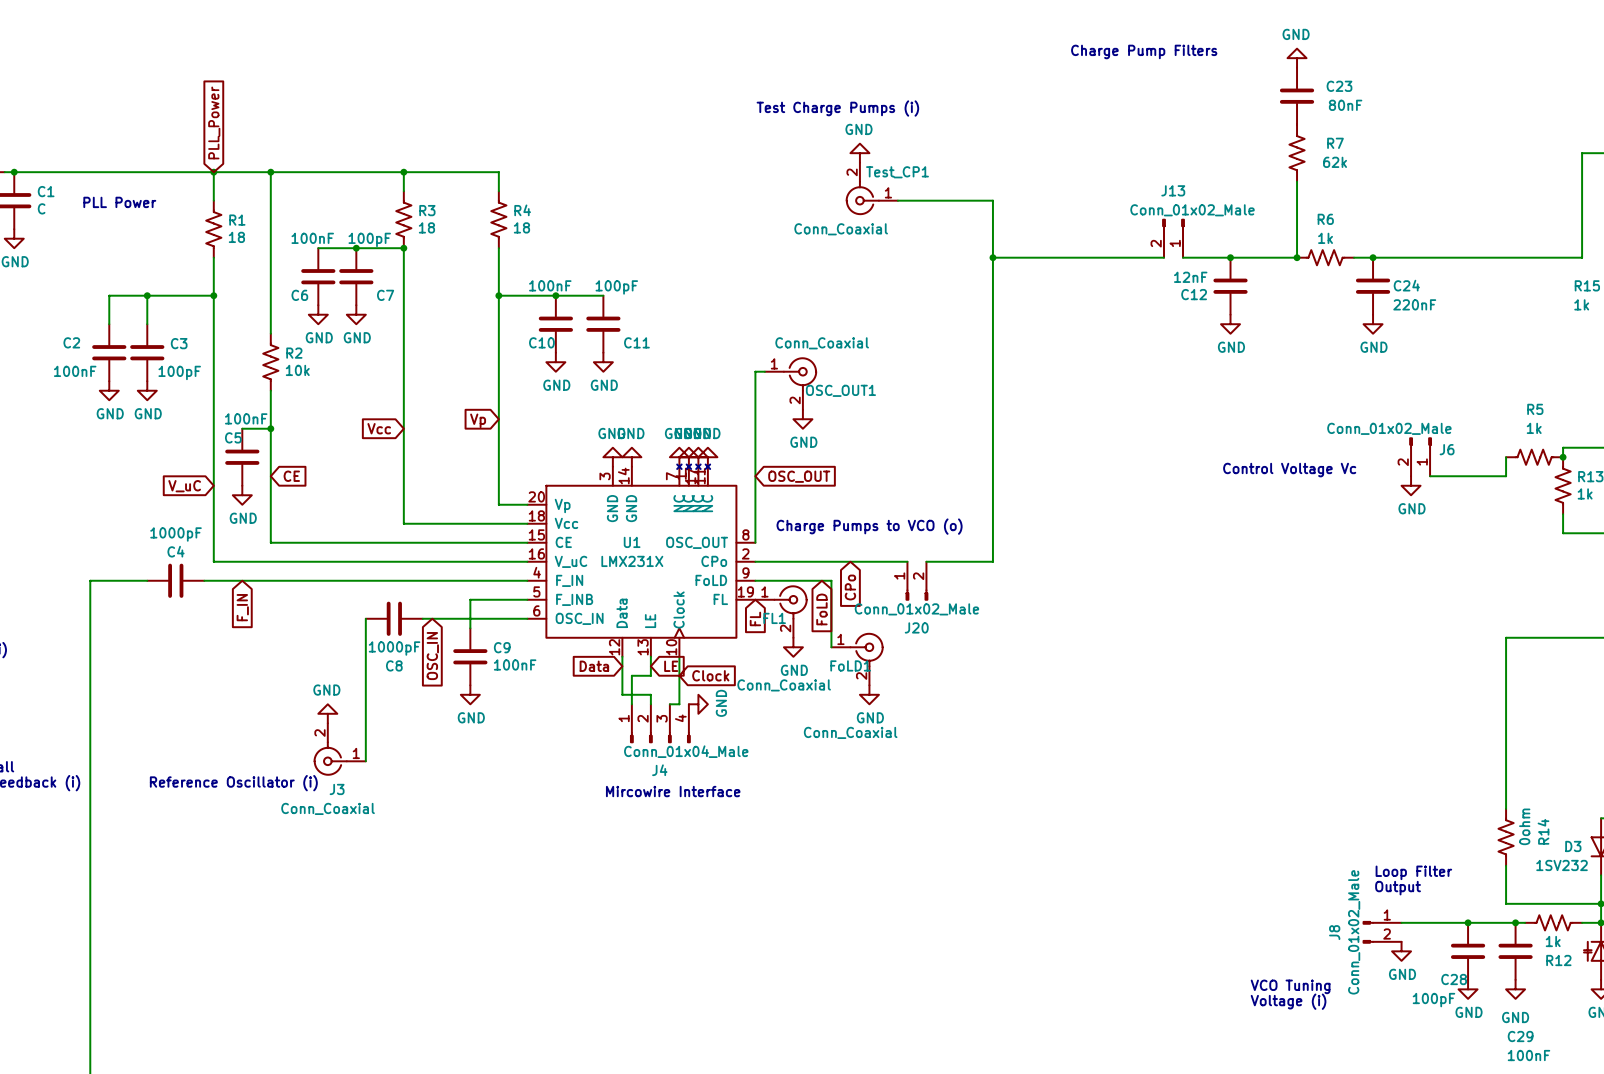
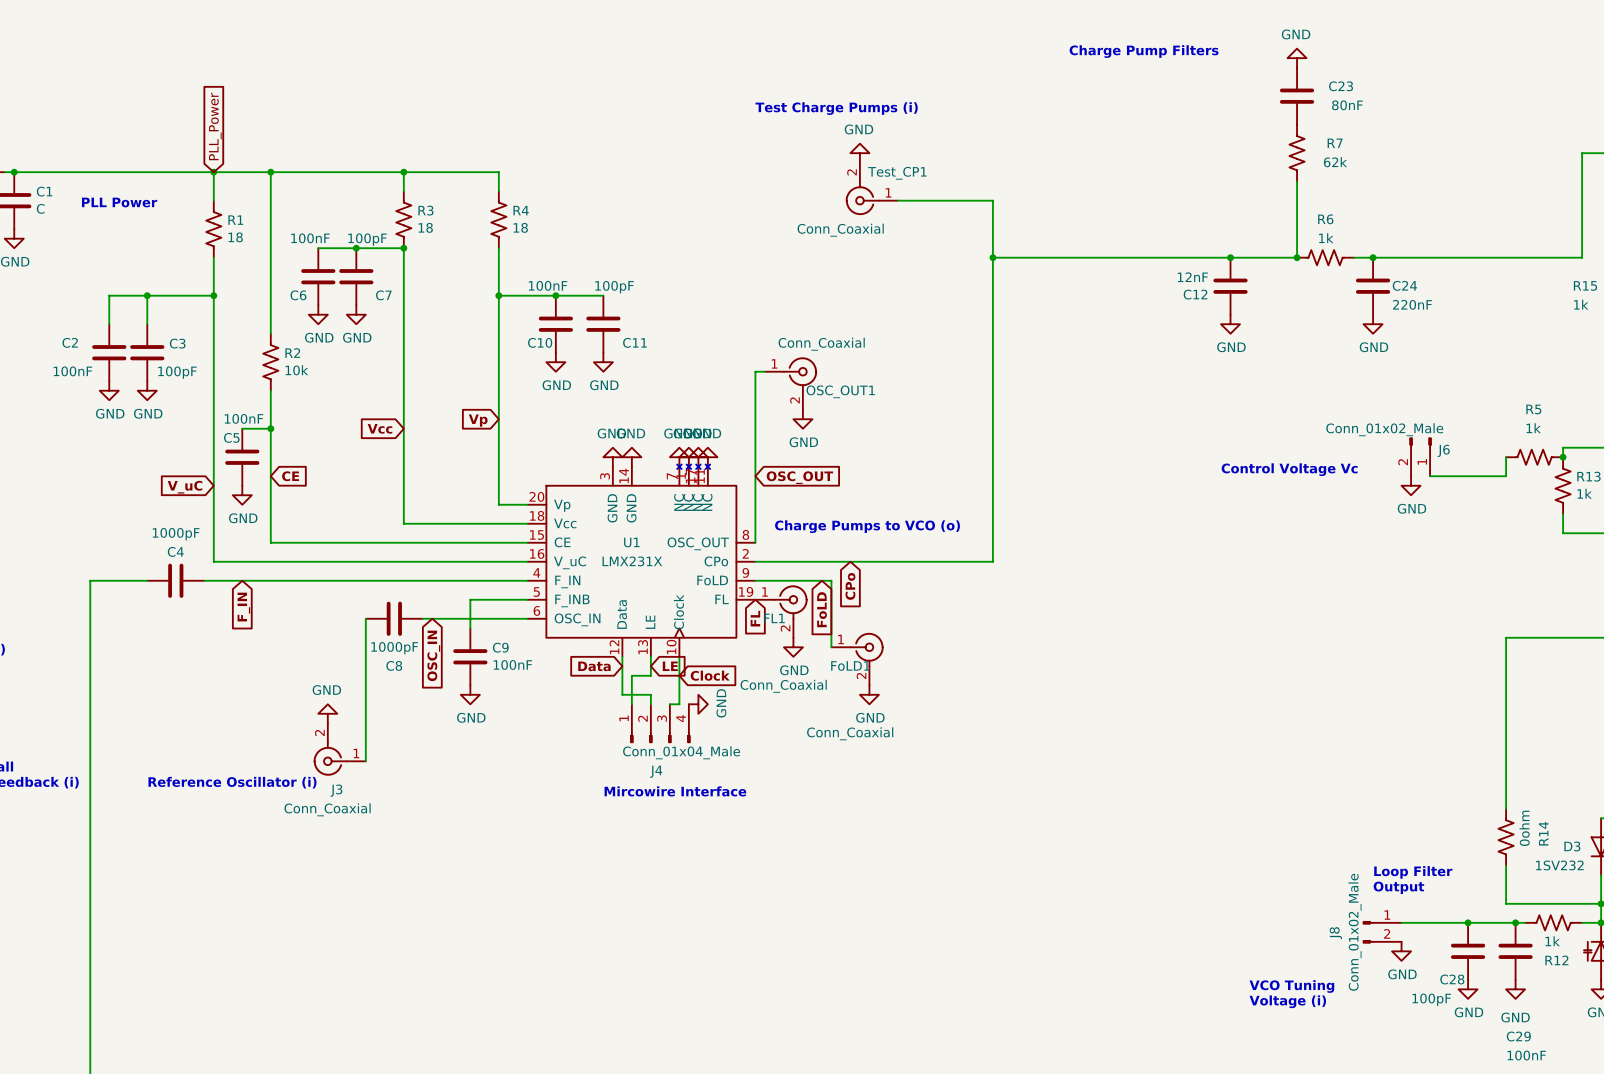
J13: Conn_01x02_Male (1173, 238) -> none
wire: none -> (1164, 257) (1183, 257)
wire: none -> (907, 561) (926, 561)
J20: Conn_01x02_Male (916, 581) -> none

